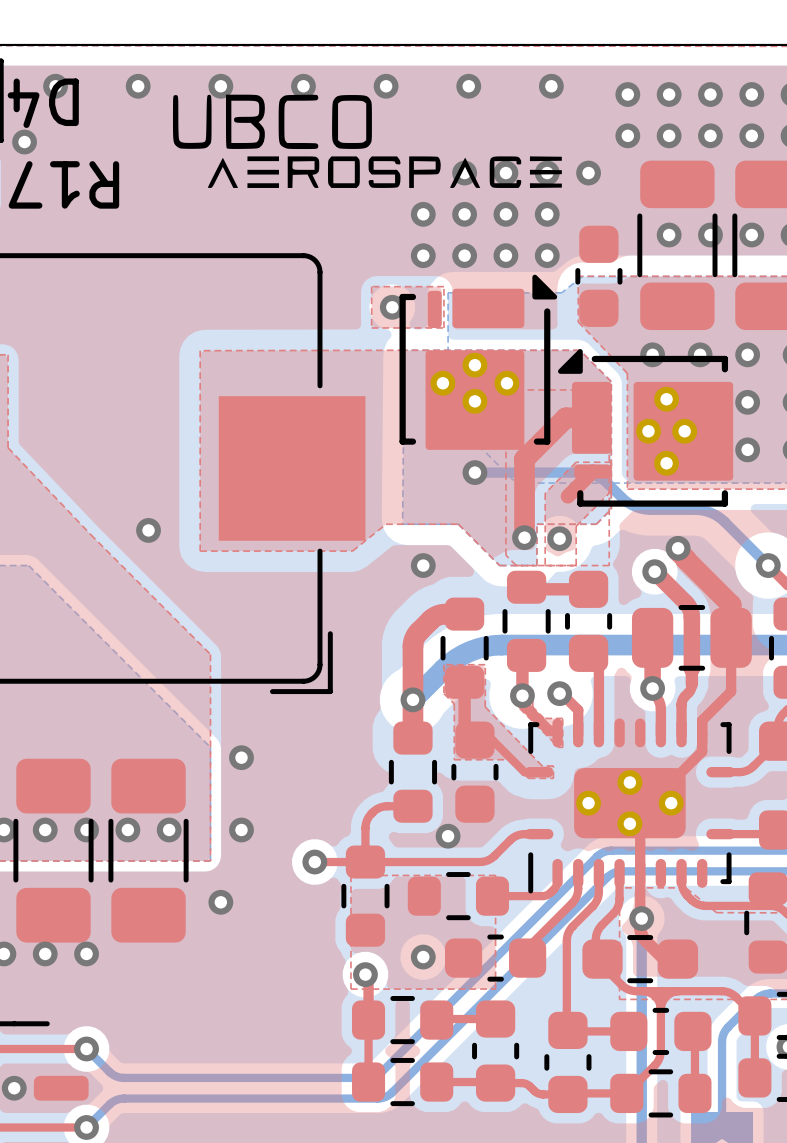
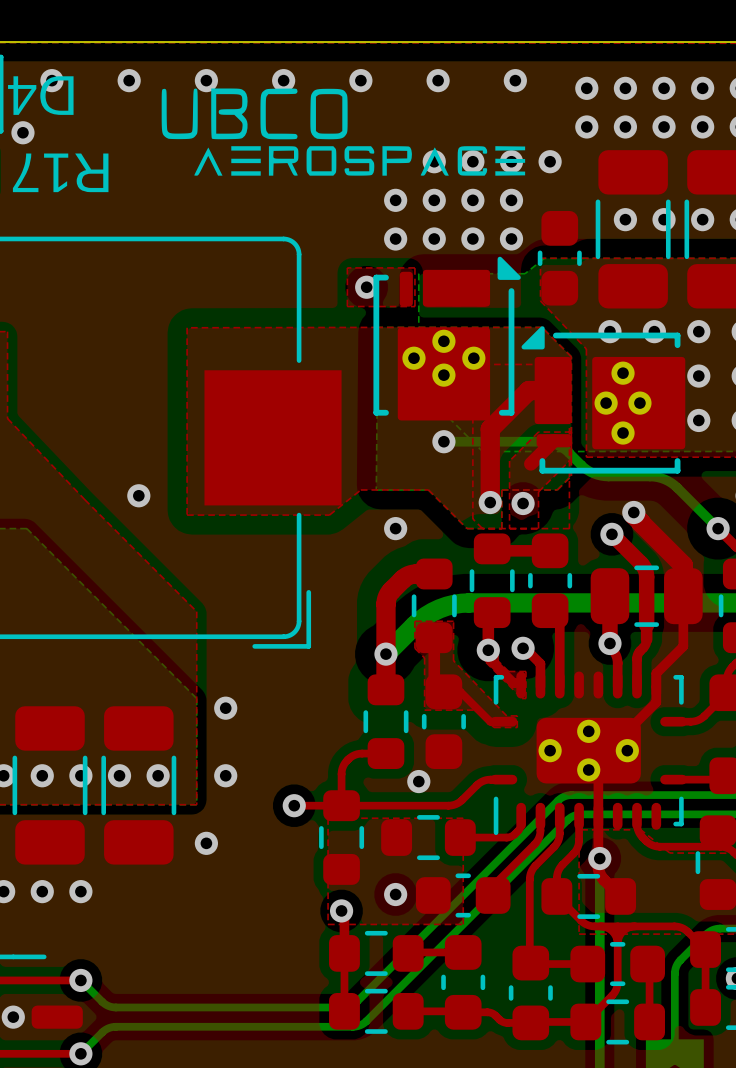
part footprint: [13, 758, 94, 943] -> [12, 706, 88, 865]
part footprint: [108, 758, 189, 943] -> [101, 706, 177, 865]
part footprint: [582, 935, 699, 984] -> [541, 873, 637, 919]

